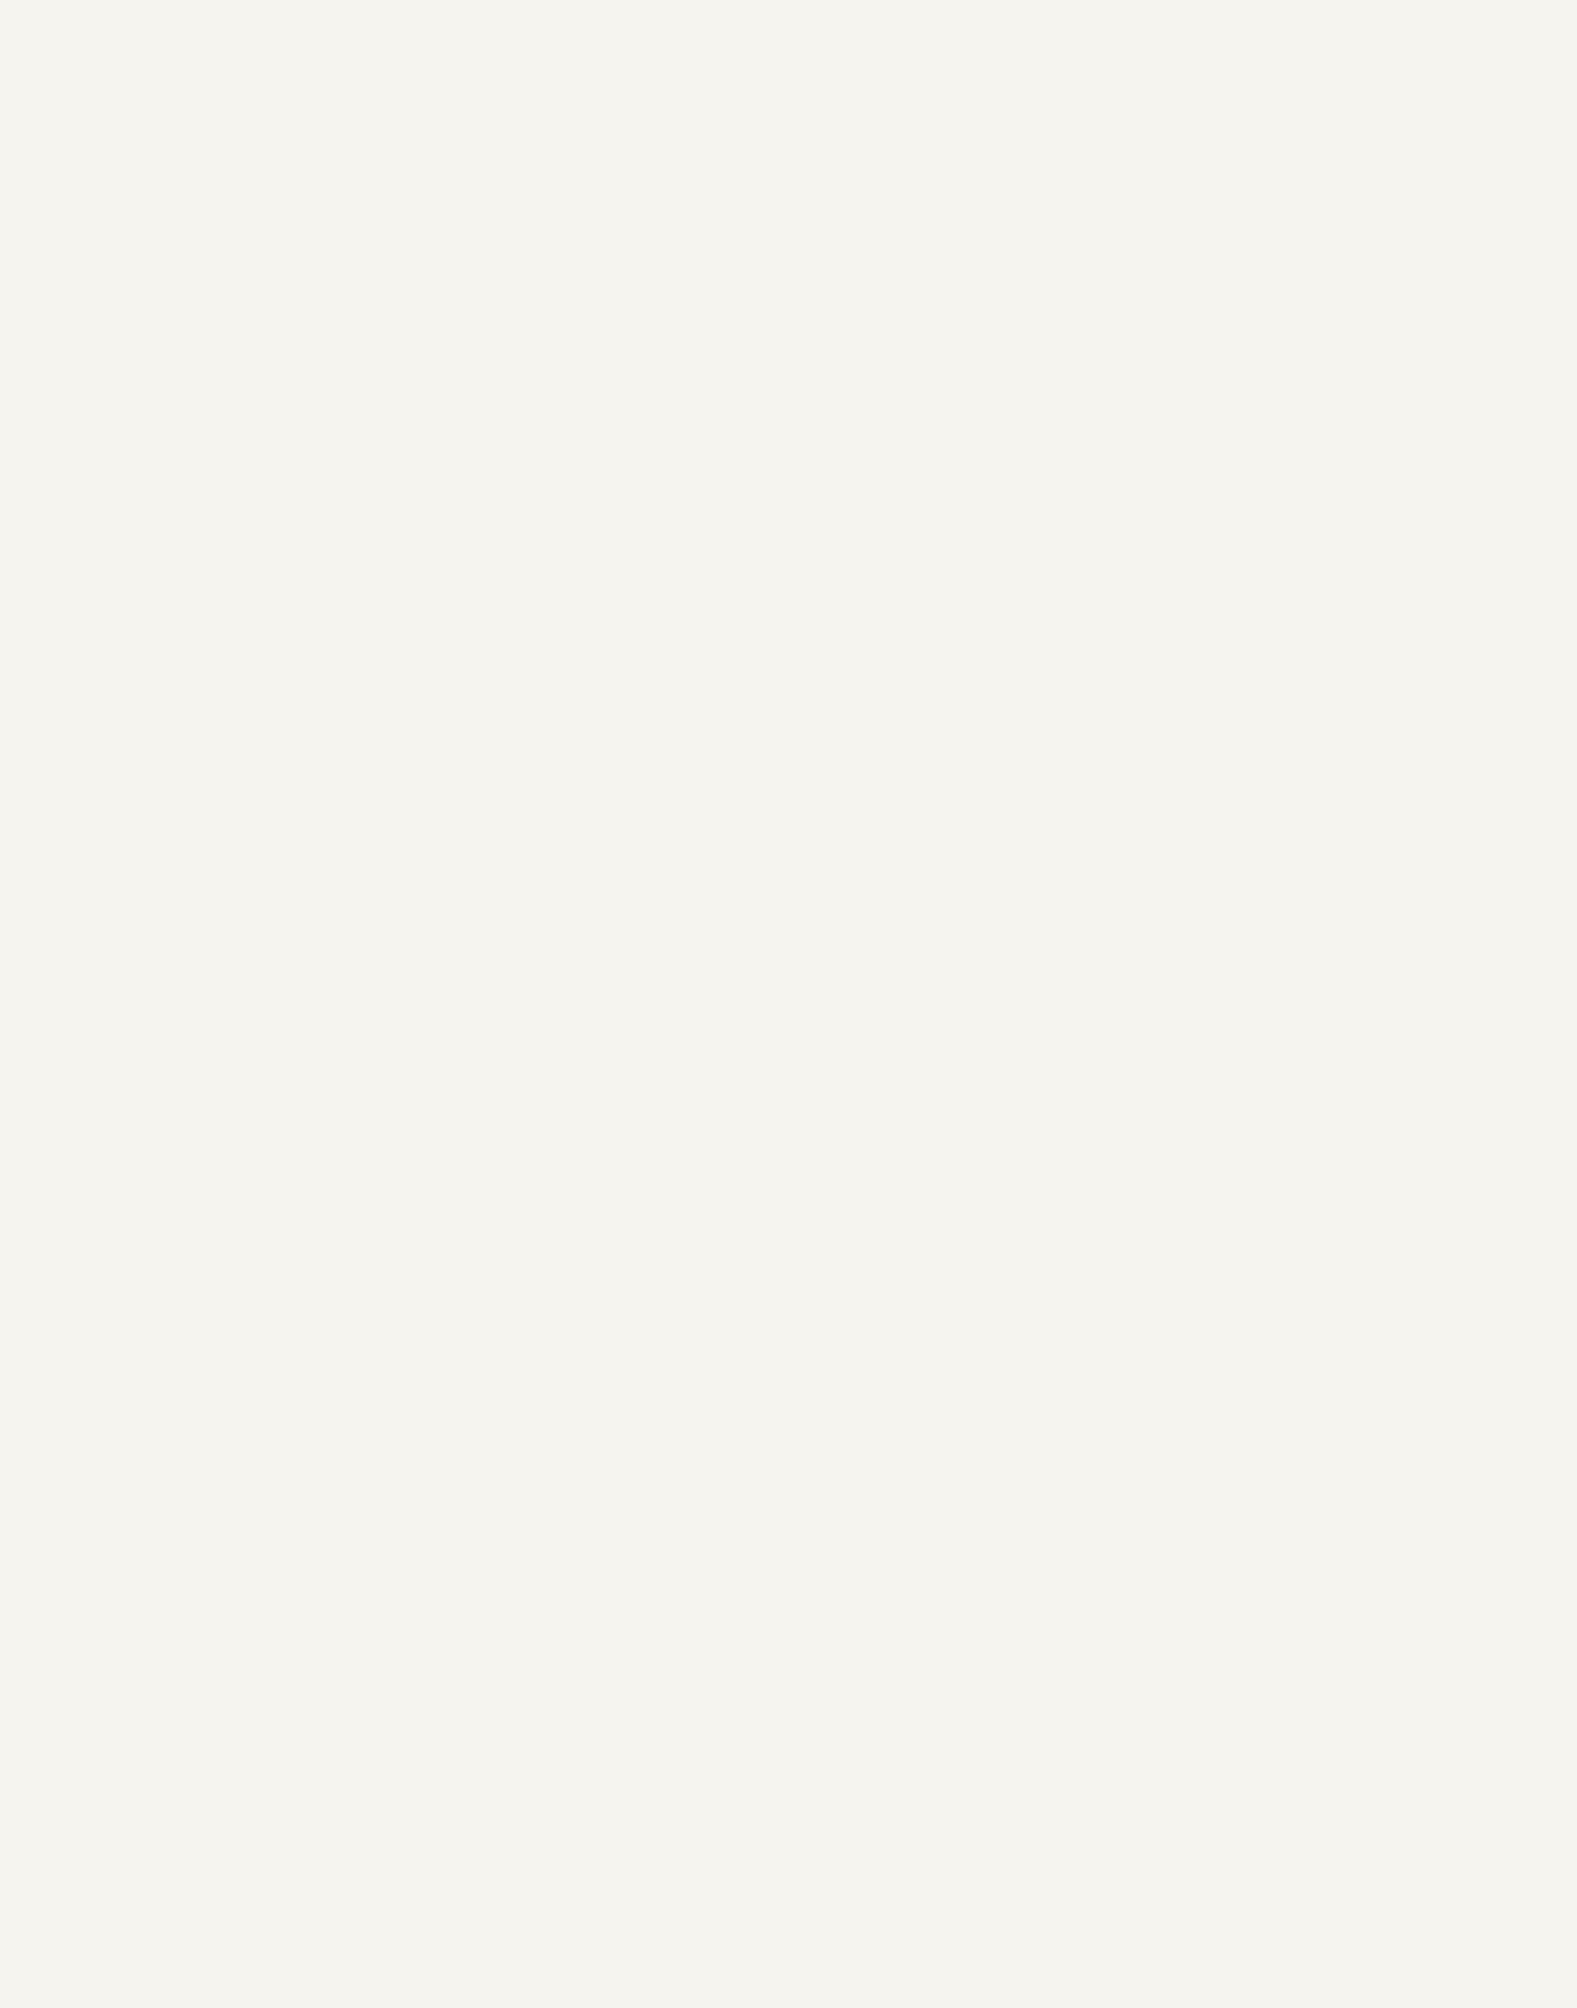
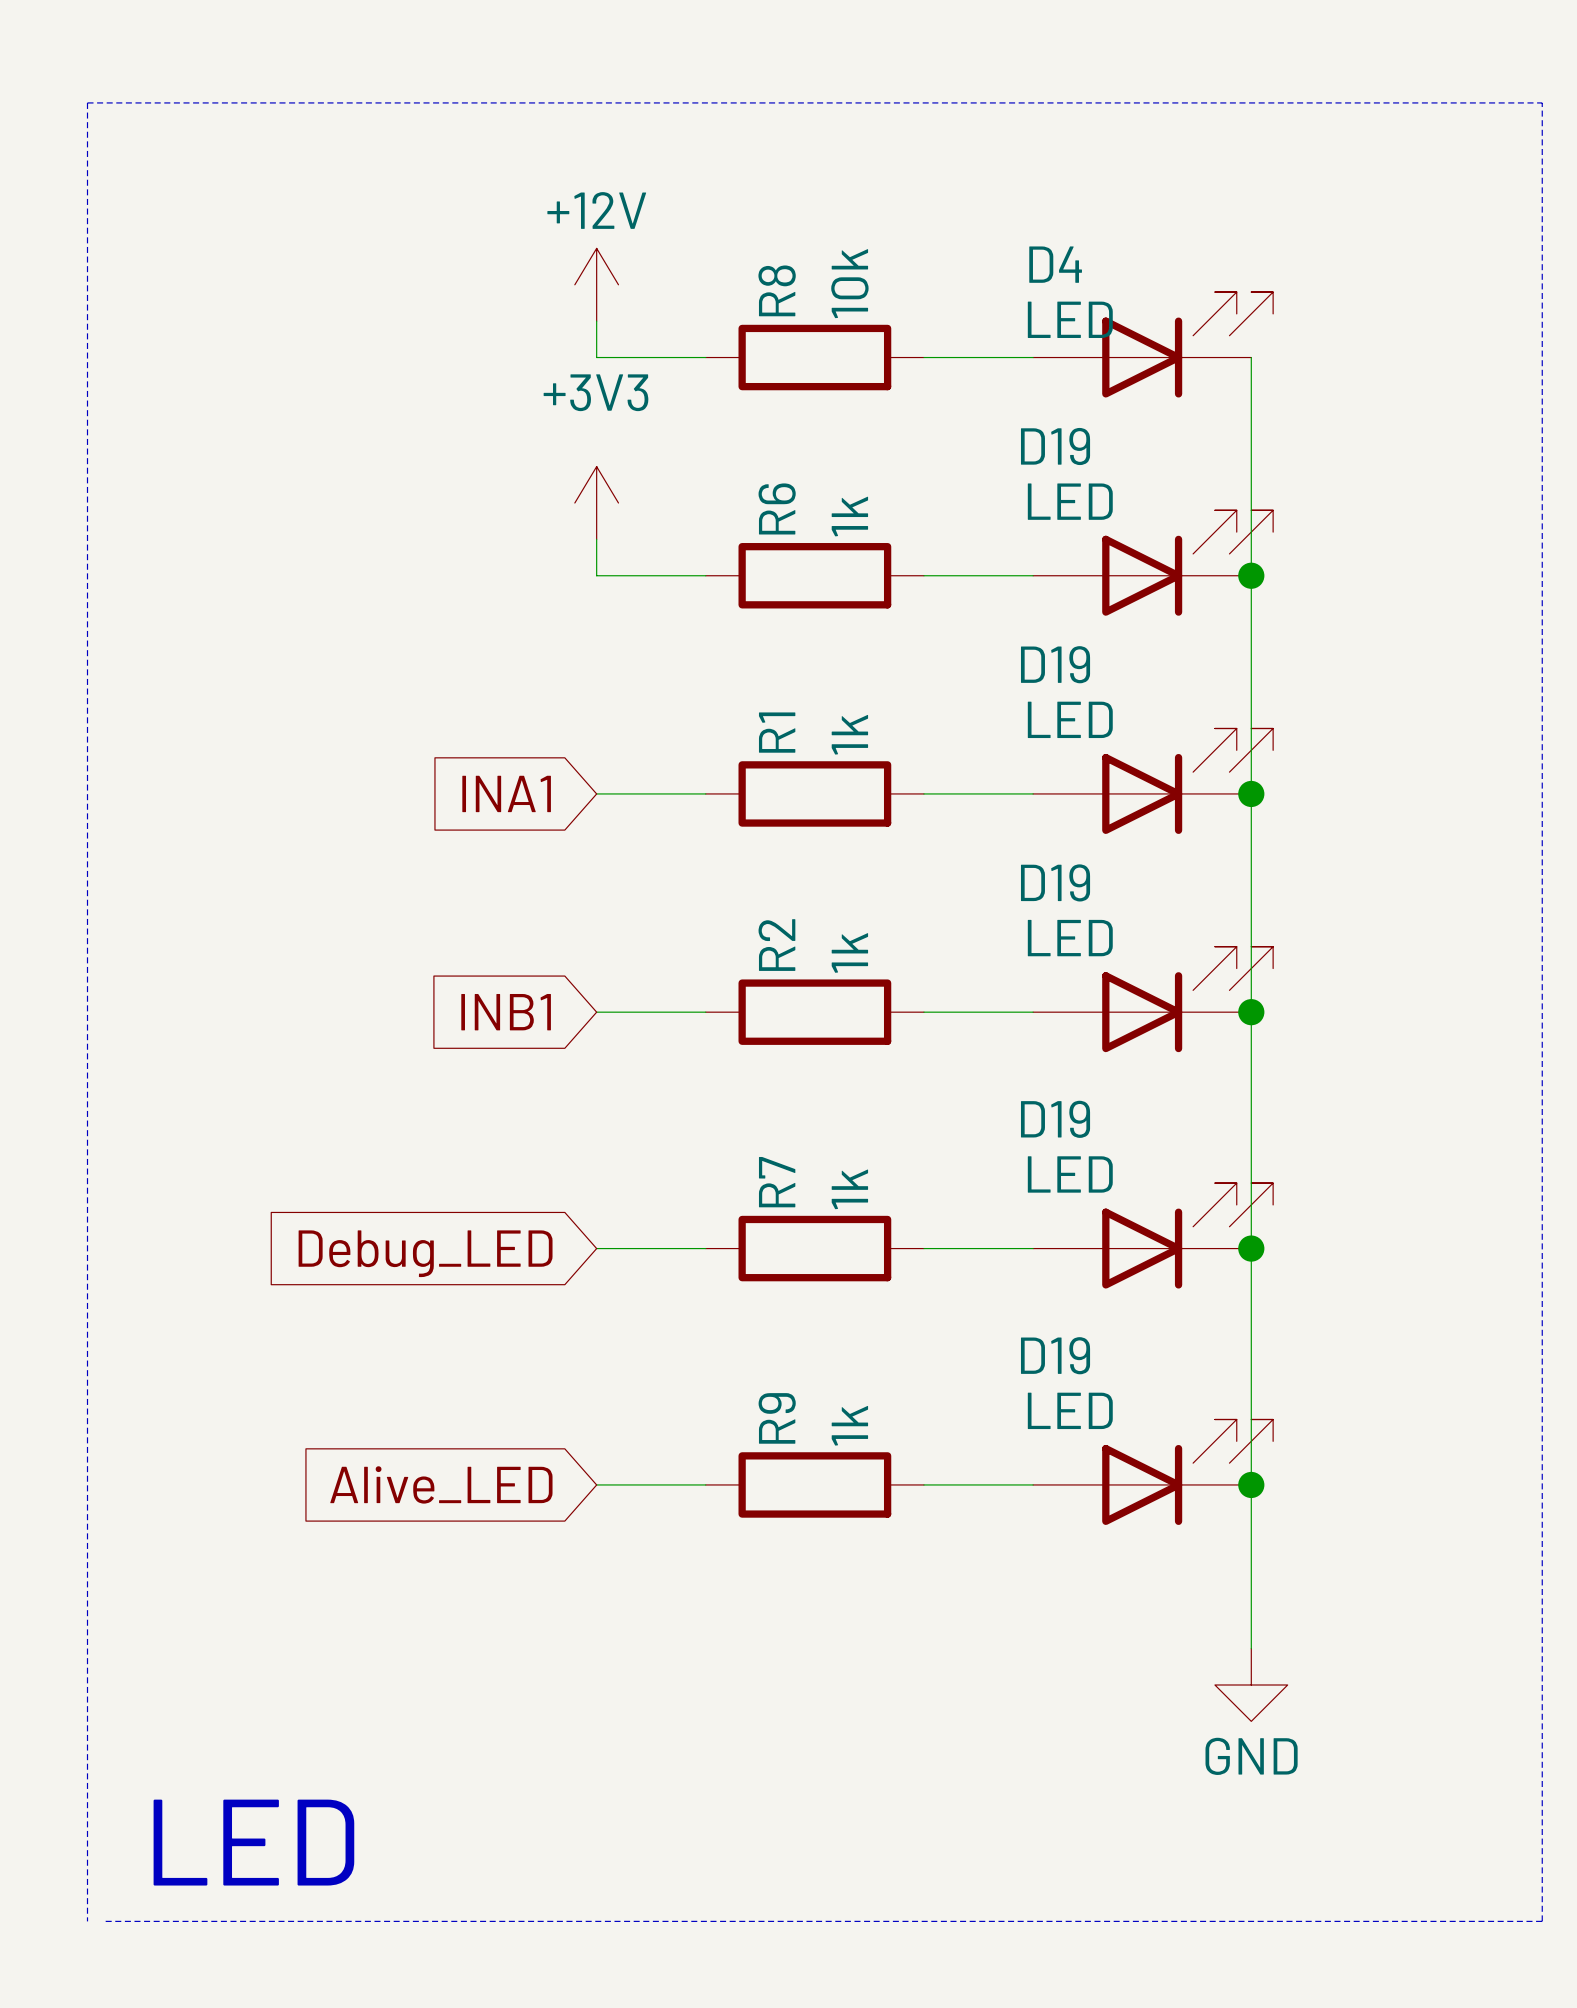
power symbol: none -> +12V (596, 284)
wire: none -> (596, 321) (596, 357) (705, 357)
D4: none -> LED (1153, 344)
R8: none -> 10k (814, 357)
wire: none -> (923, 357) (1033, 357)
wire: none -> (1251, 357) (1251, 1648)
power symbol: none -> +3V3 (596, 503)
wire: none -> (596, 539) (596, 575) (705, 575)
D19: none -> LED (1153, 563)
R6: none -> 1k (814, 575)
wire: none -> (923, 575) (1033, 575)
junction: none -> (1251, 575)
D19: none -> LED (1153, 781)
global label: none -> INA1 (506, 793)
wire: none -> (596, 793) (705, 793)
R1: none -> 1k (814, 793)
wire: none -> (923, 793) (1033, 793)
junction: none -> (1251, 793)
D19: none -> LED (1153, 999)
global label: none -> INB1 (506, 1012)
wire: none -> (596, 1012) (705, 1012)
R2: none -> 1k (814, 1012)
wire: none -> (923, 1012) (1033, 1012)
junction: none -> (1251, 1012)
D19: none -> LED (1153, 1235)
wire: none -> (596, 1248) (705, 1248)
R7: none -> 1k (814, 1248)
wire: none -> (923, 1248) (1033, 1248)
junction: none -> (1251, 1248)
global label: none -> Debug_LED (425, 1253)
D19: none -> LED (1153, 1472)
global label: none -> Alive_LED (441, 1484)
wire: none -> (596, 1484) (705, 1484)
R9: none -> 1k (814, 1484)
wire: none -> (923, 1484) (1033, 1484)
junction: none -> (1251, 1484)
power symbol: none -> GND (1251, 1684)
text: none -> LED (253, 1842)
line: none -> (87, 1921) (87, 102) (1542, 102) (1542, 1921) (105, 1921)

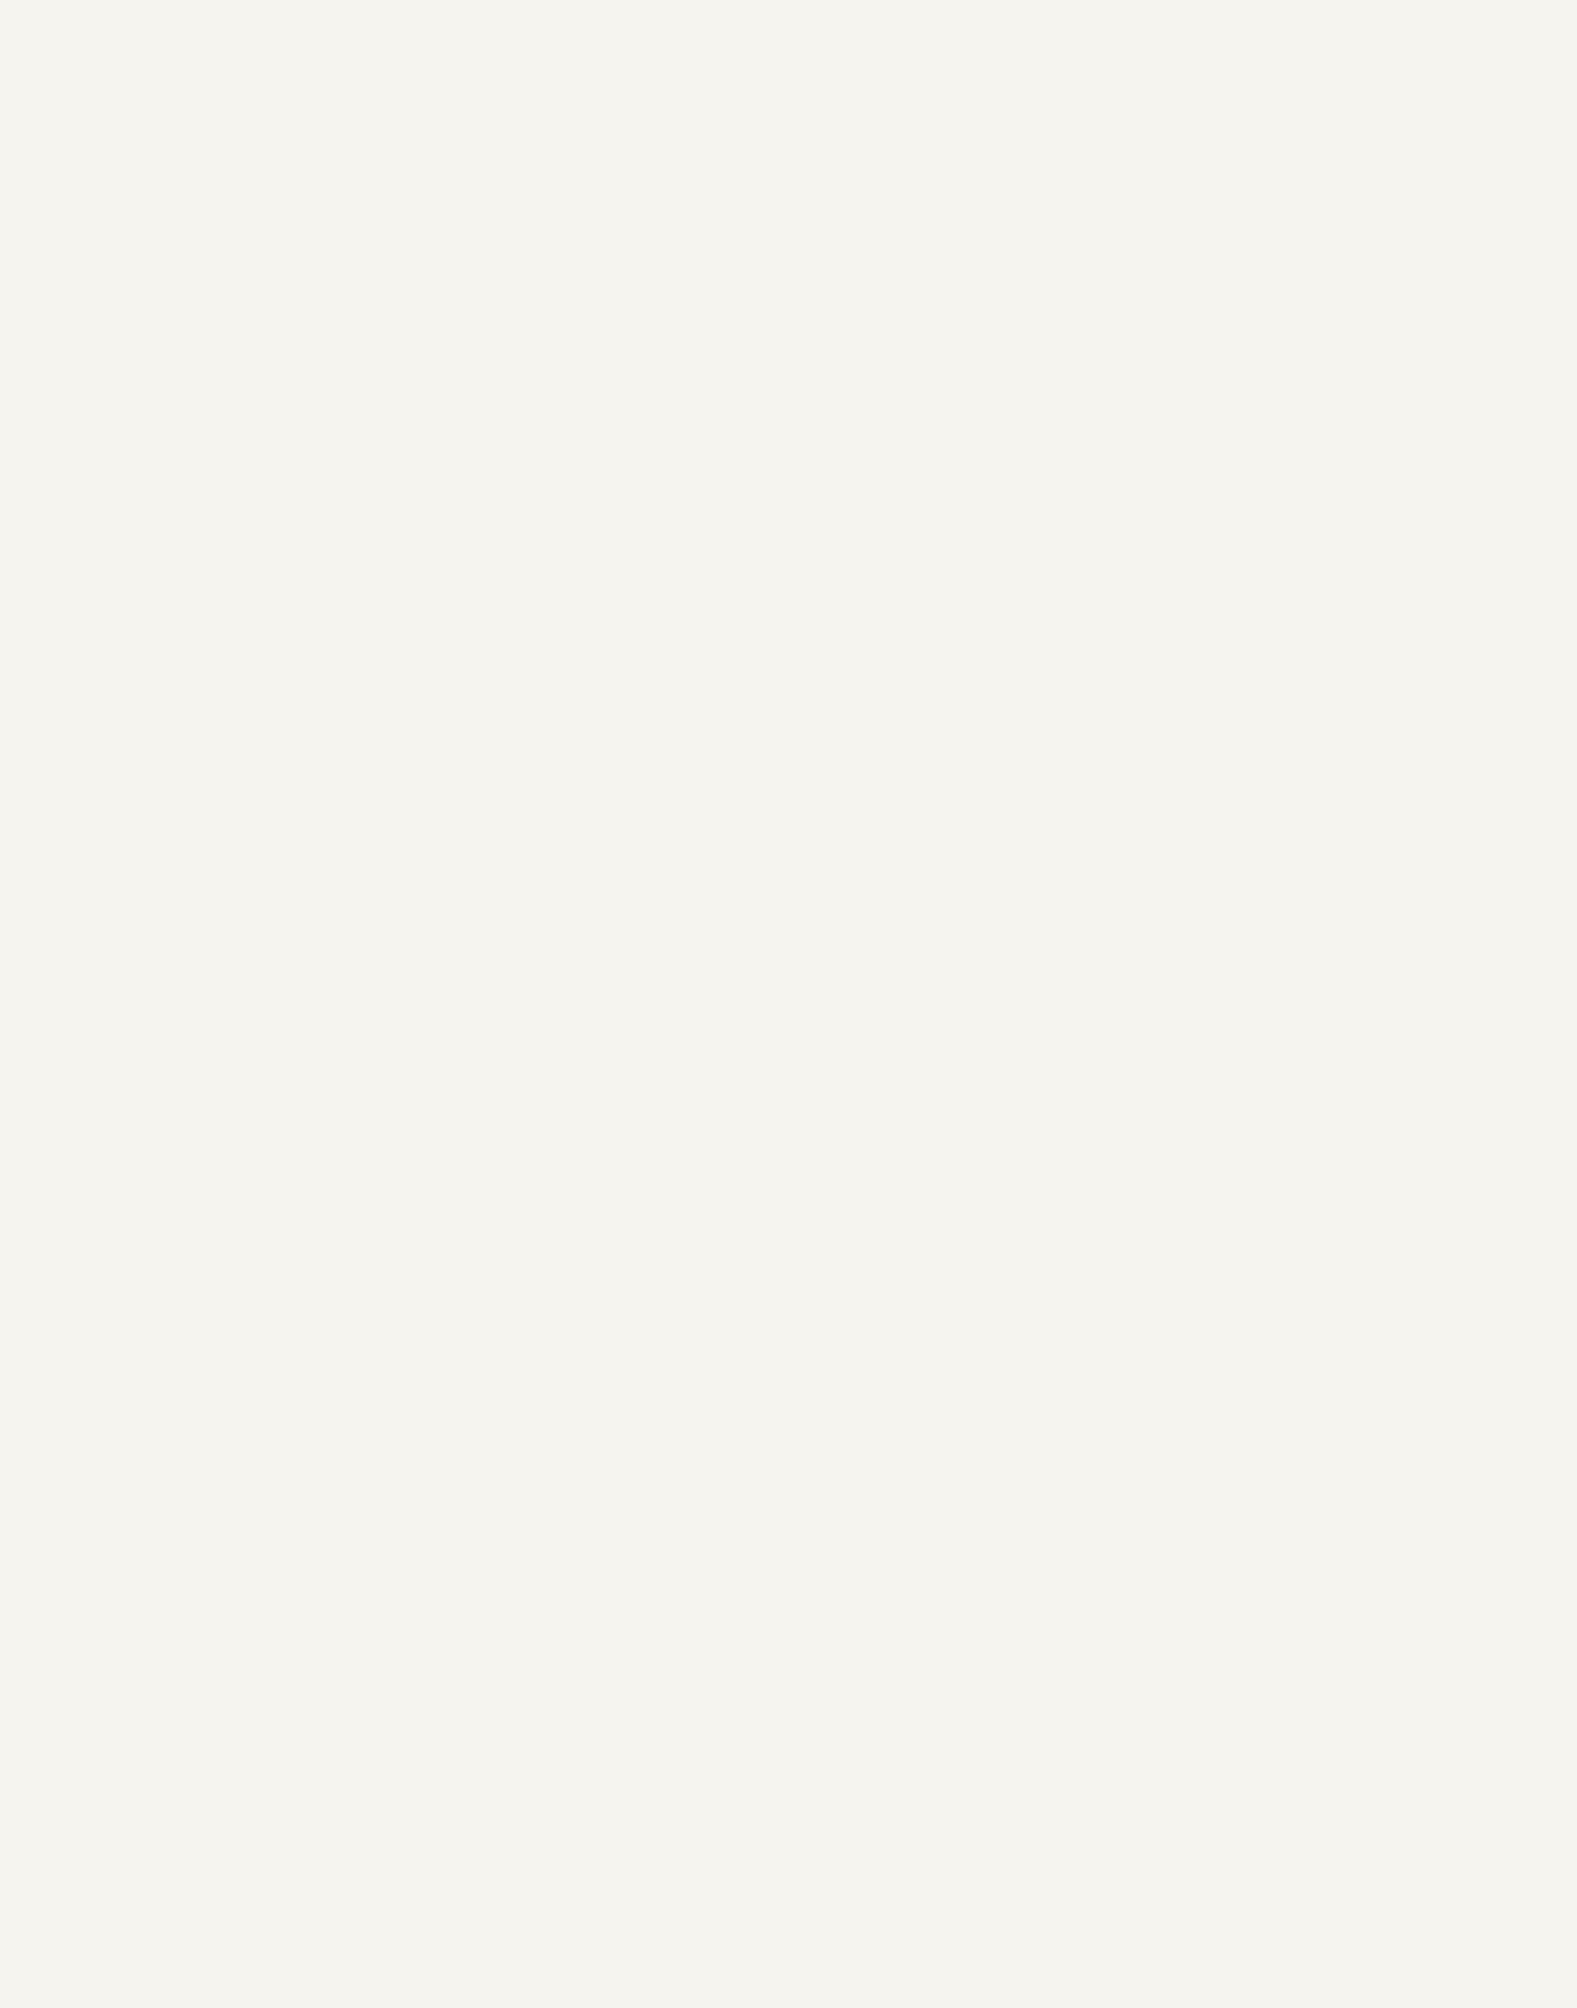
power symbol: +12V (596, 284) -> none
wire: (596, 321) (596, 357) (705, 357) -> none
D4: LED (1153, 344) -> none
R8: 10k (814, 357) -> none
wire: (923, 357) (1033, 357) -> none
wire: (1251, 357) (1251, 1648) -> none
power symbol: +3V3 (596, 503) -> none
wire: (596, 539) (596, 575) (705, 575) -> none
D19: LED (1153, 563) -> none
R6: 1k (814, 575) -> none
wire: (923, 575) (1033, 575) -> none
junction: (1251, 575) -> none
D19: LED (1153, 781) -> none
global label: INA1 (506, 793) -> none
wire: (596, 793) (705, 793) -> none
R1: 1k (814, 793) -> none
wire: (923, 793) (1033, 793) -> none
junction: (1251, 793) -> none
D19: LED (1153, 999) -> none
global label: INB1 (506, 1012) -> none
wire: (596, 1012) (705, 1012) -> none
R2: 1k (814, 1012) -> none
wire: (923, 1012) (1033, 1012) -> none
junction: (1251, 1012) -> none
D19: LED (1153, 1235) -> none
wire: (596, 1248) (705, 1248) -> none
R7: 1k (814, 1248) -> none
wire: (923, 1248) (1033, 1248) -> none
junction: (1251, 1248) -> none
global label: Debug_LED (425, 1253) -> none
D19: LED (1153, 1472) -> none
global label: Alive_LED (441, 1484) -> none
wire: (596, 1484) (705, 1484) -> none
R9: 1k (814, 1484) -> none
wire: (923, 1484) (1033, 1484) -> none
junction: (1251, 1484) -> none
power symbol: GND (1251, 1684) -> none
text: LED (253, 1842) -> none
line: (87, 1921) (87, 102) (1542, 102) (1542, 1921) (105, 1921) -> none

